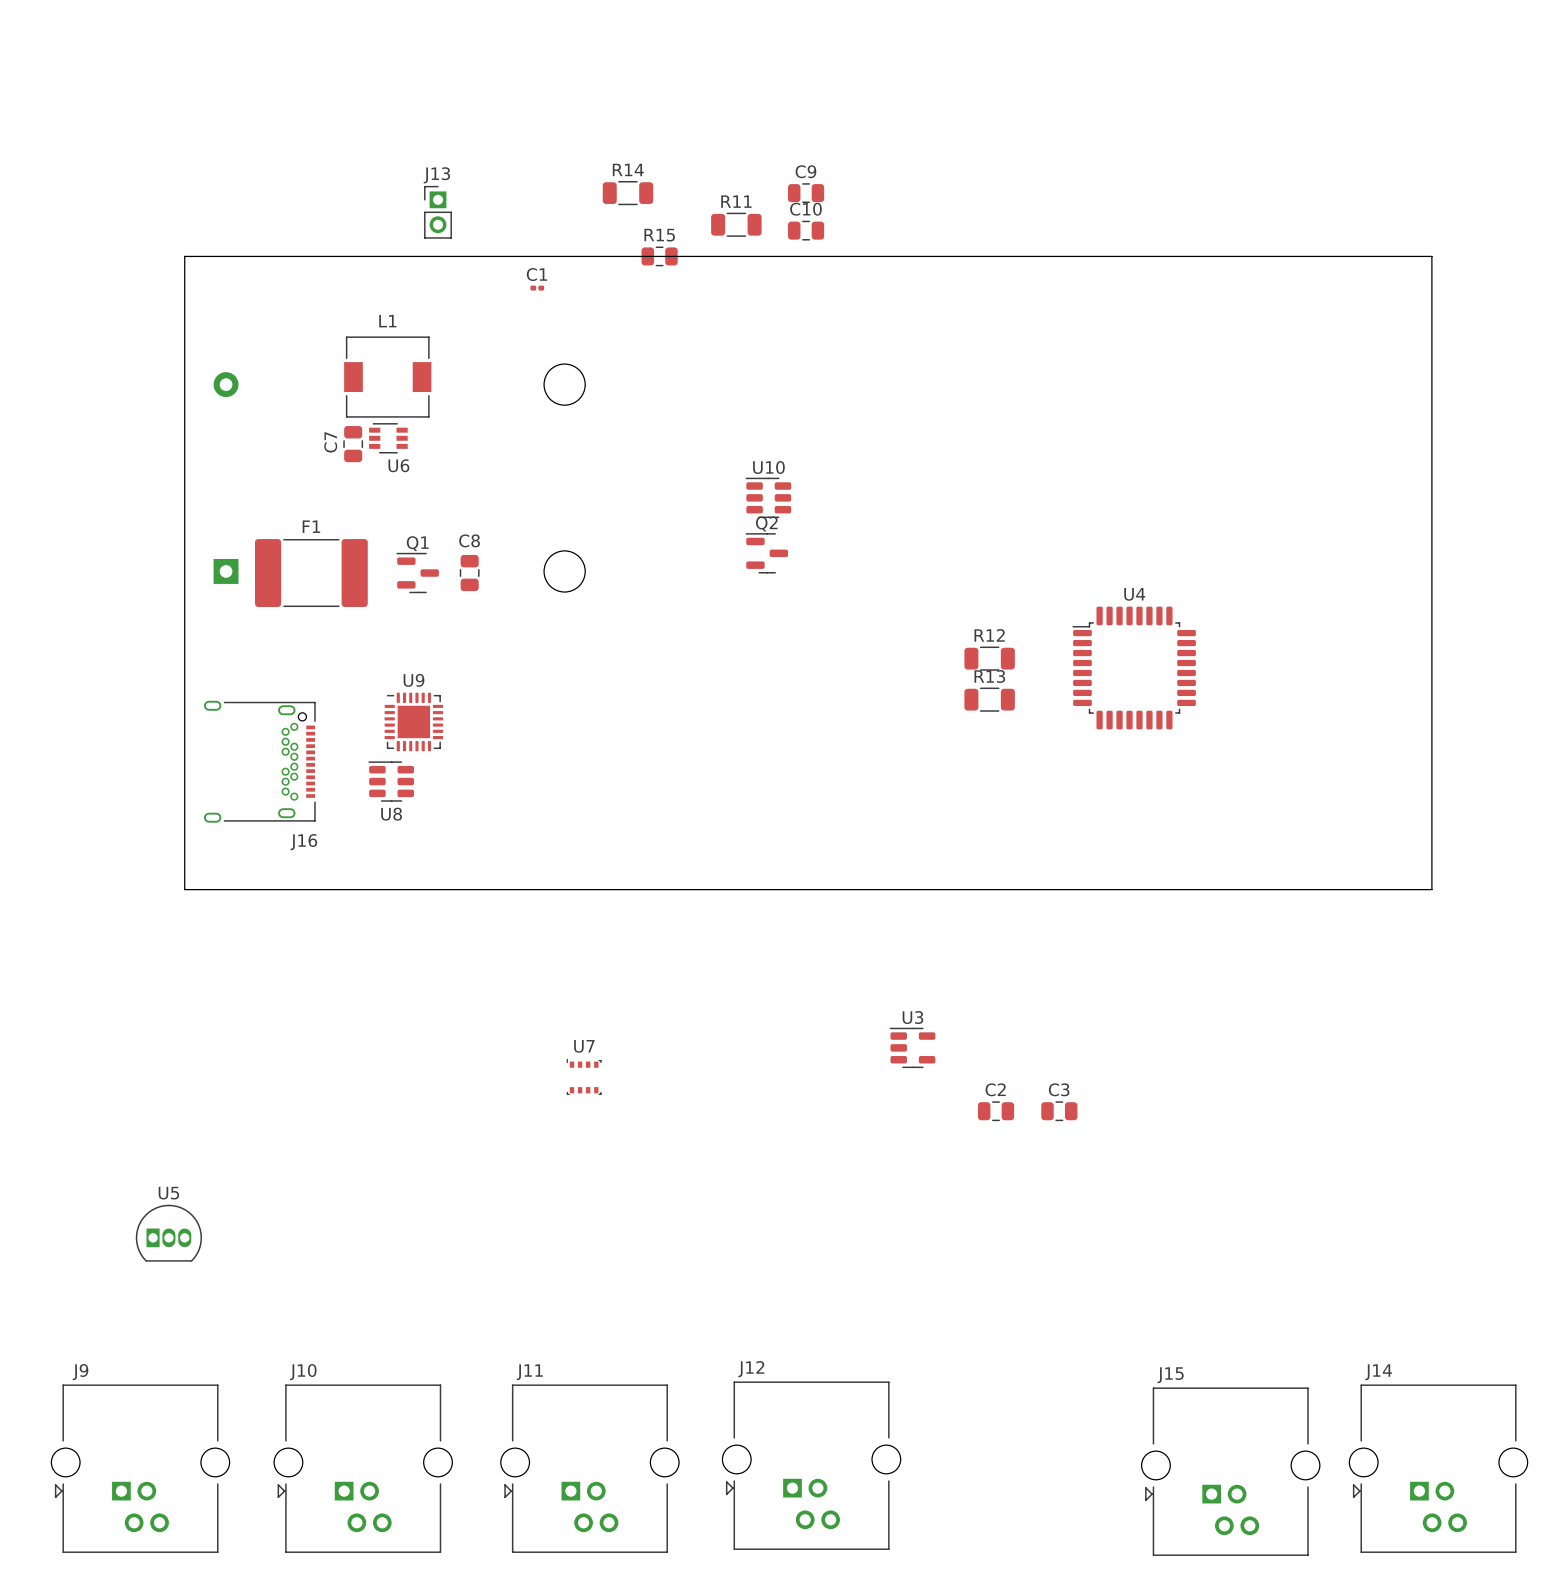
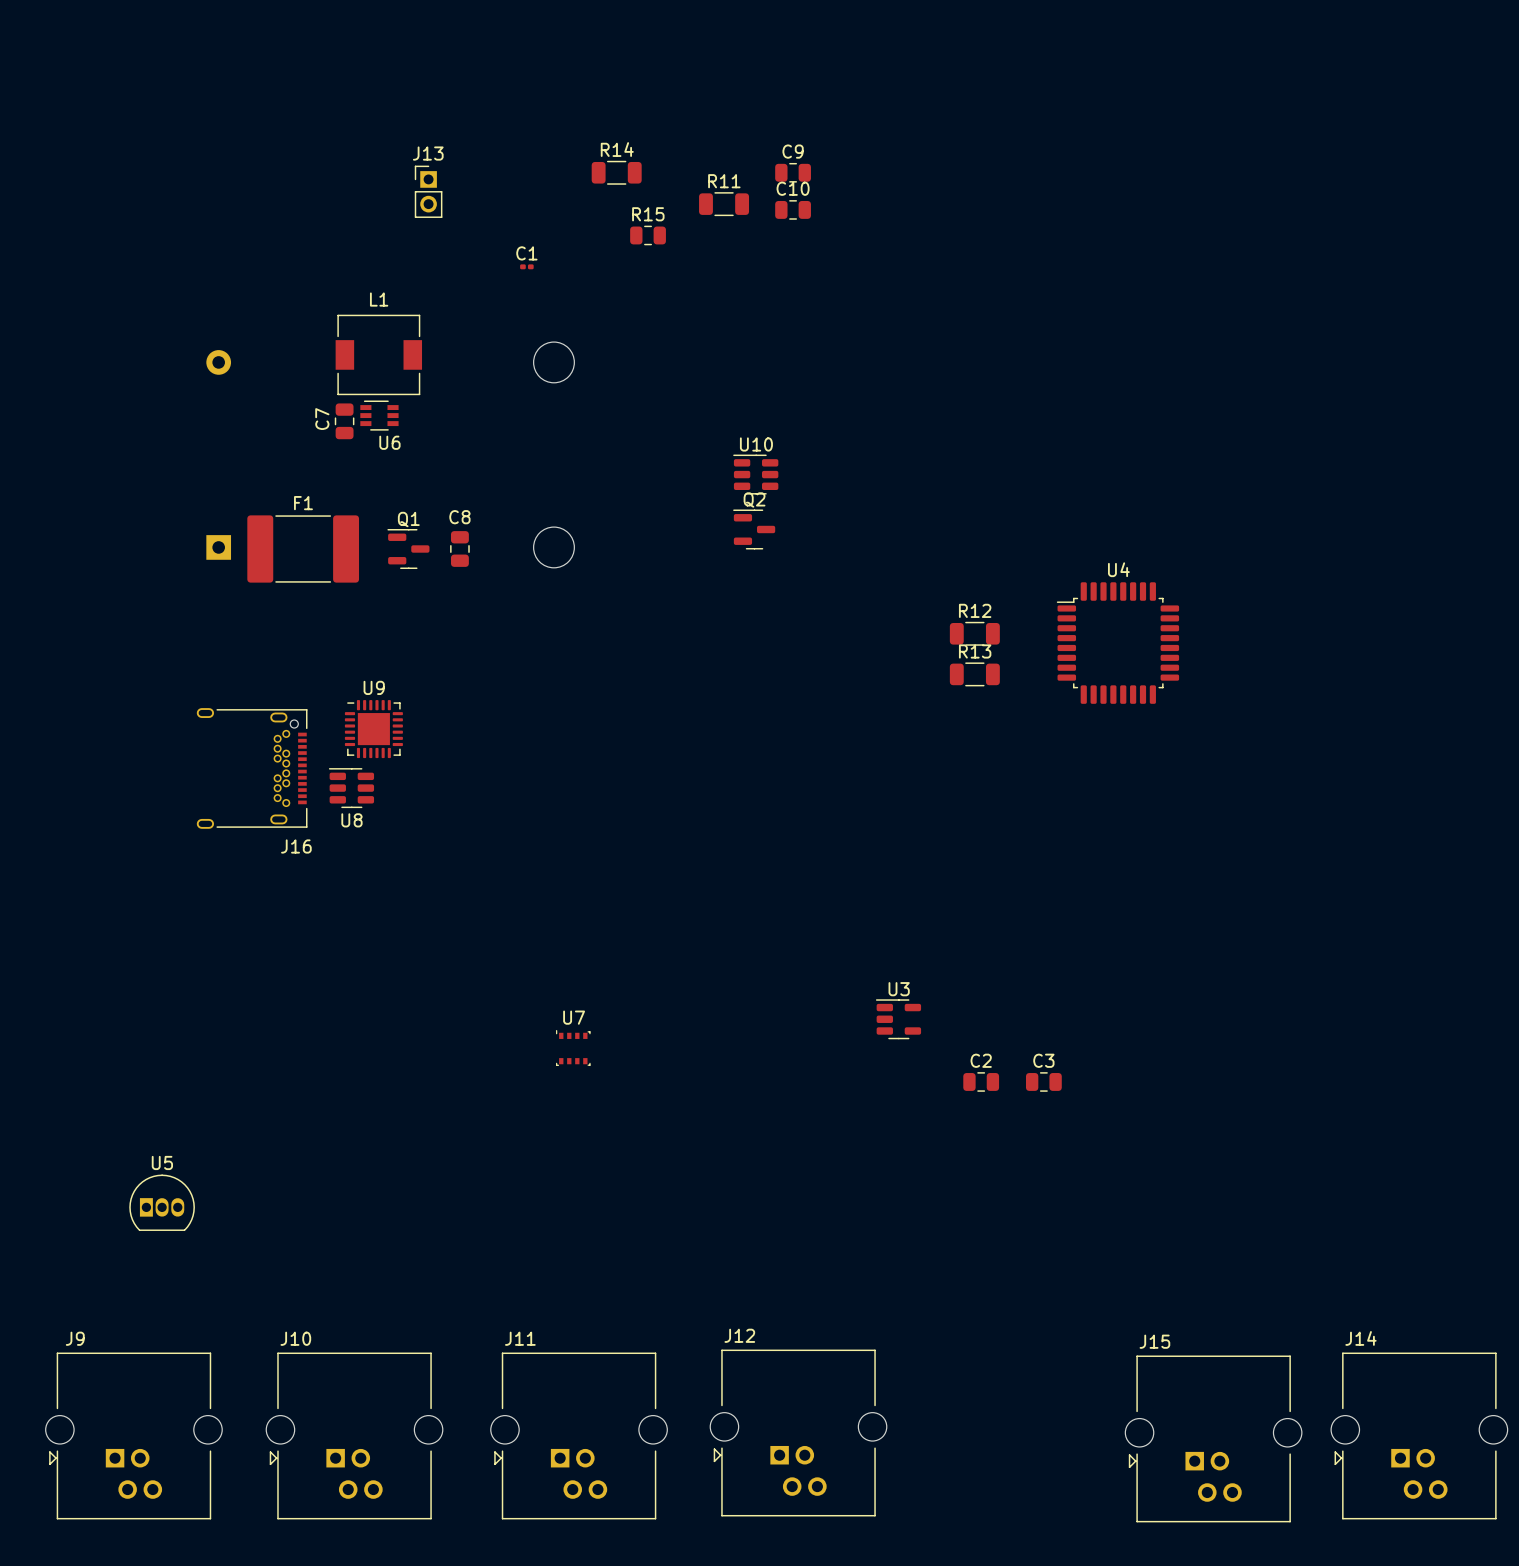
board edge: (184, 256) (1431, 256) (1431, 889) (184, 889) (184, 256) -> none
U9 position: (413, 721) -> (373, 729)
J16 position: (259, 761) -> (252, 768)
U8 position: (391, 781) -> (351, 788)

